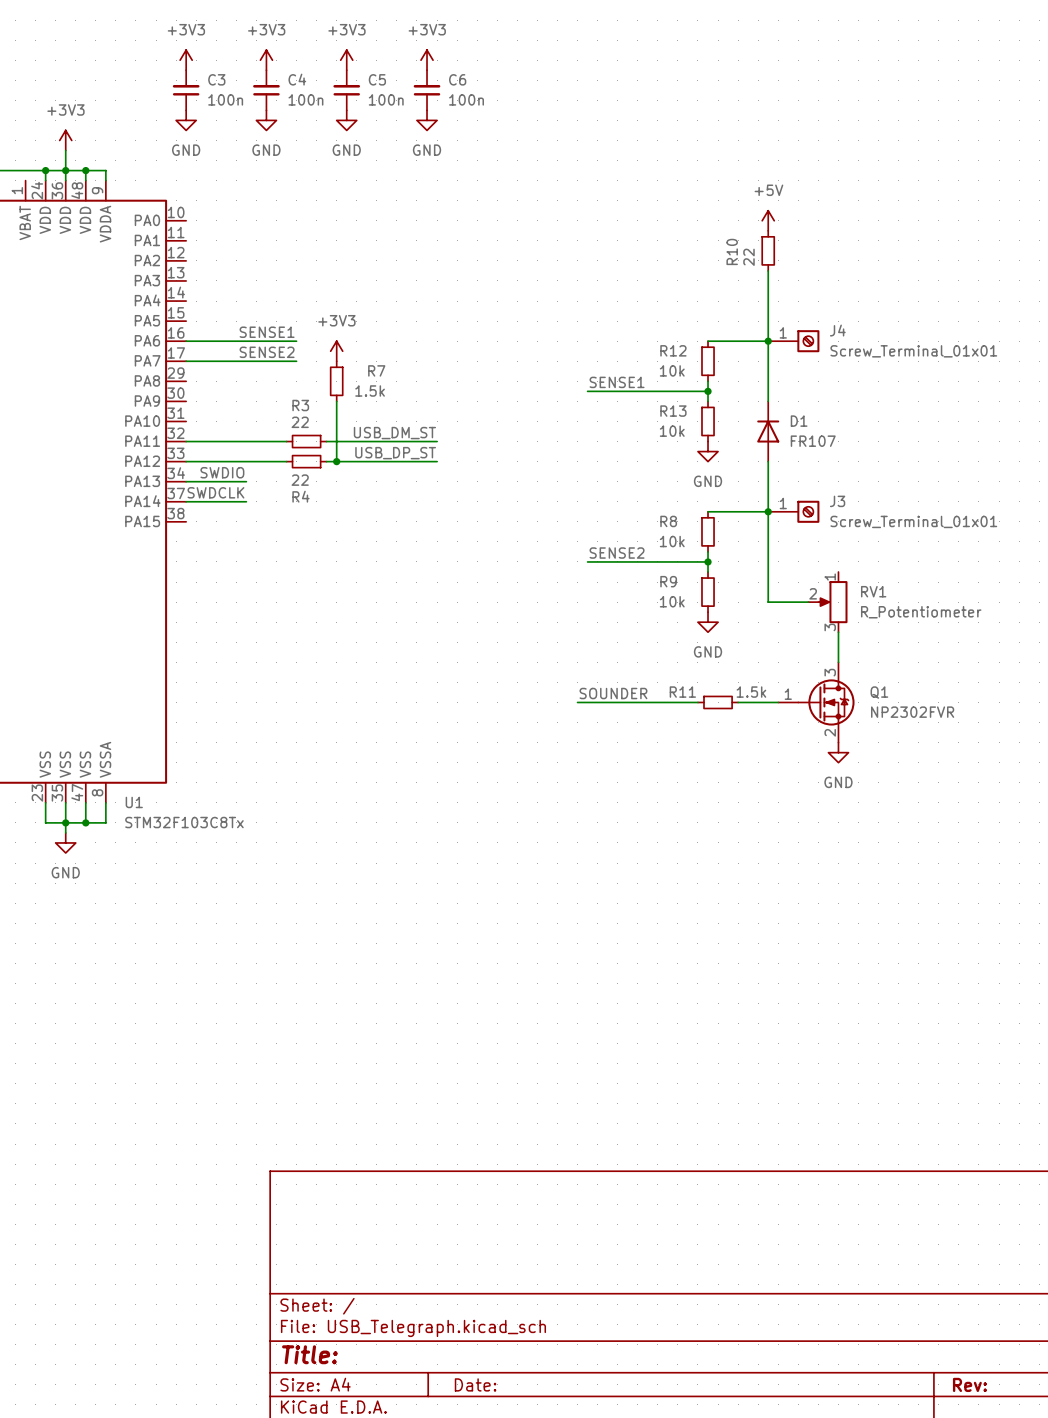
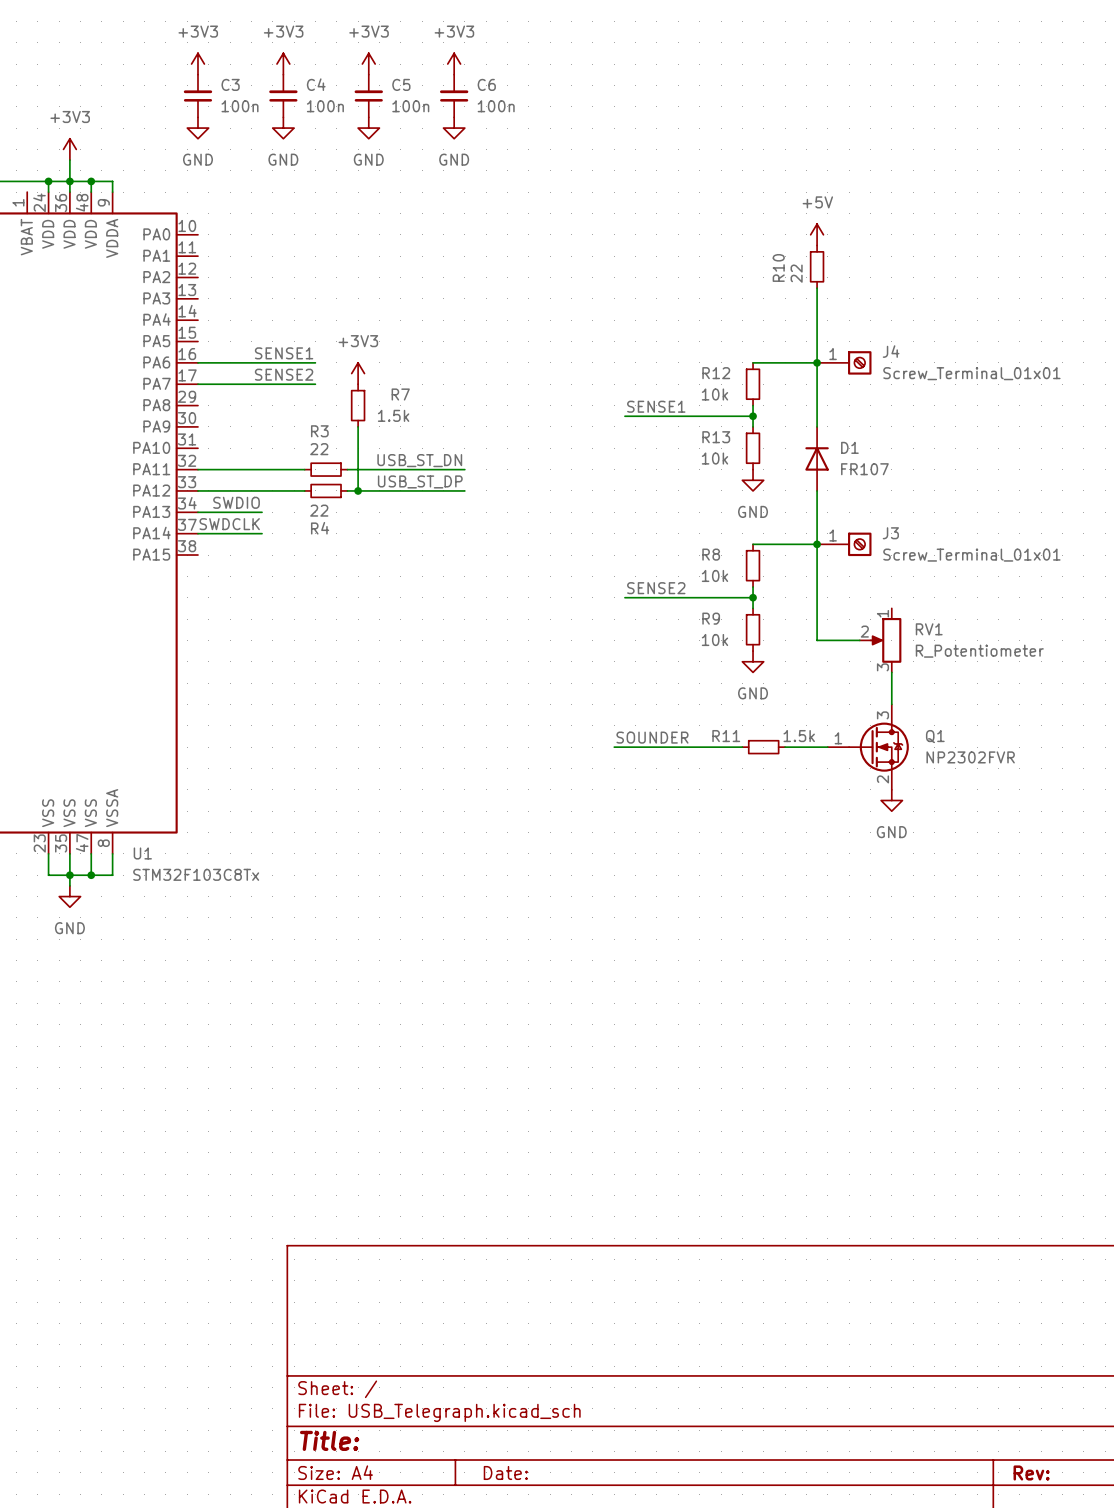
label: USB_DM_ST (394, 433) -> USB_ST_DN (419, 460)
label: USB_DP_ST (395, 453) -> USB_ST_DP (420, 481)

